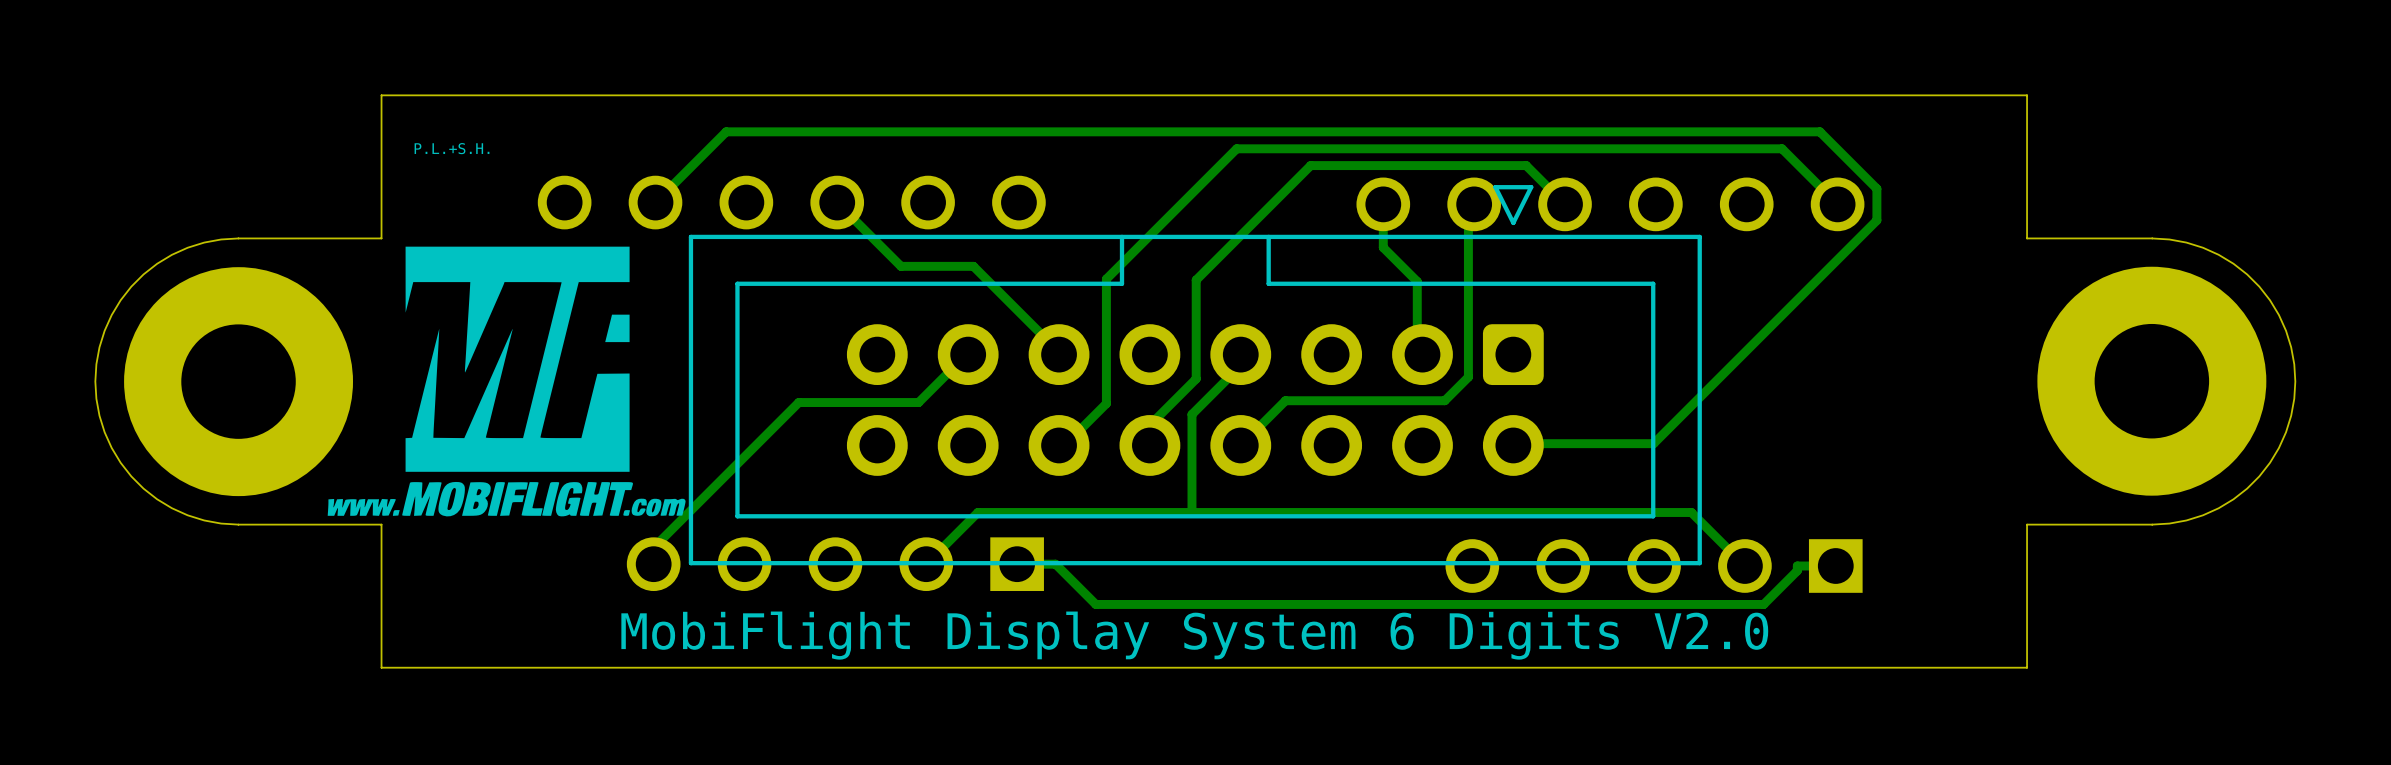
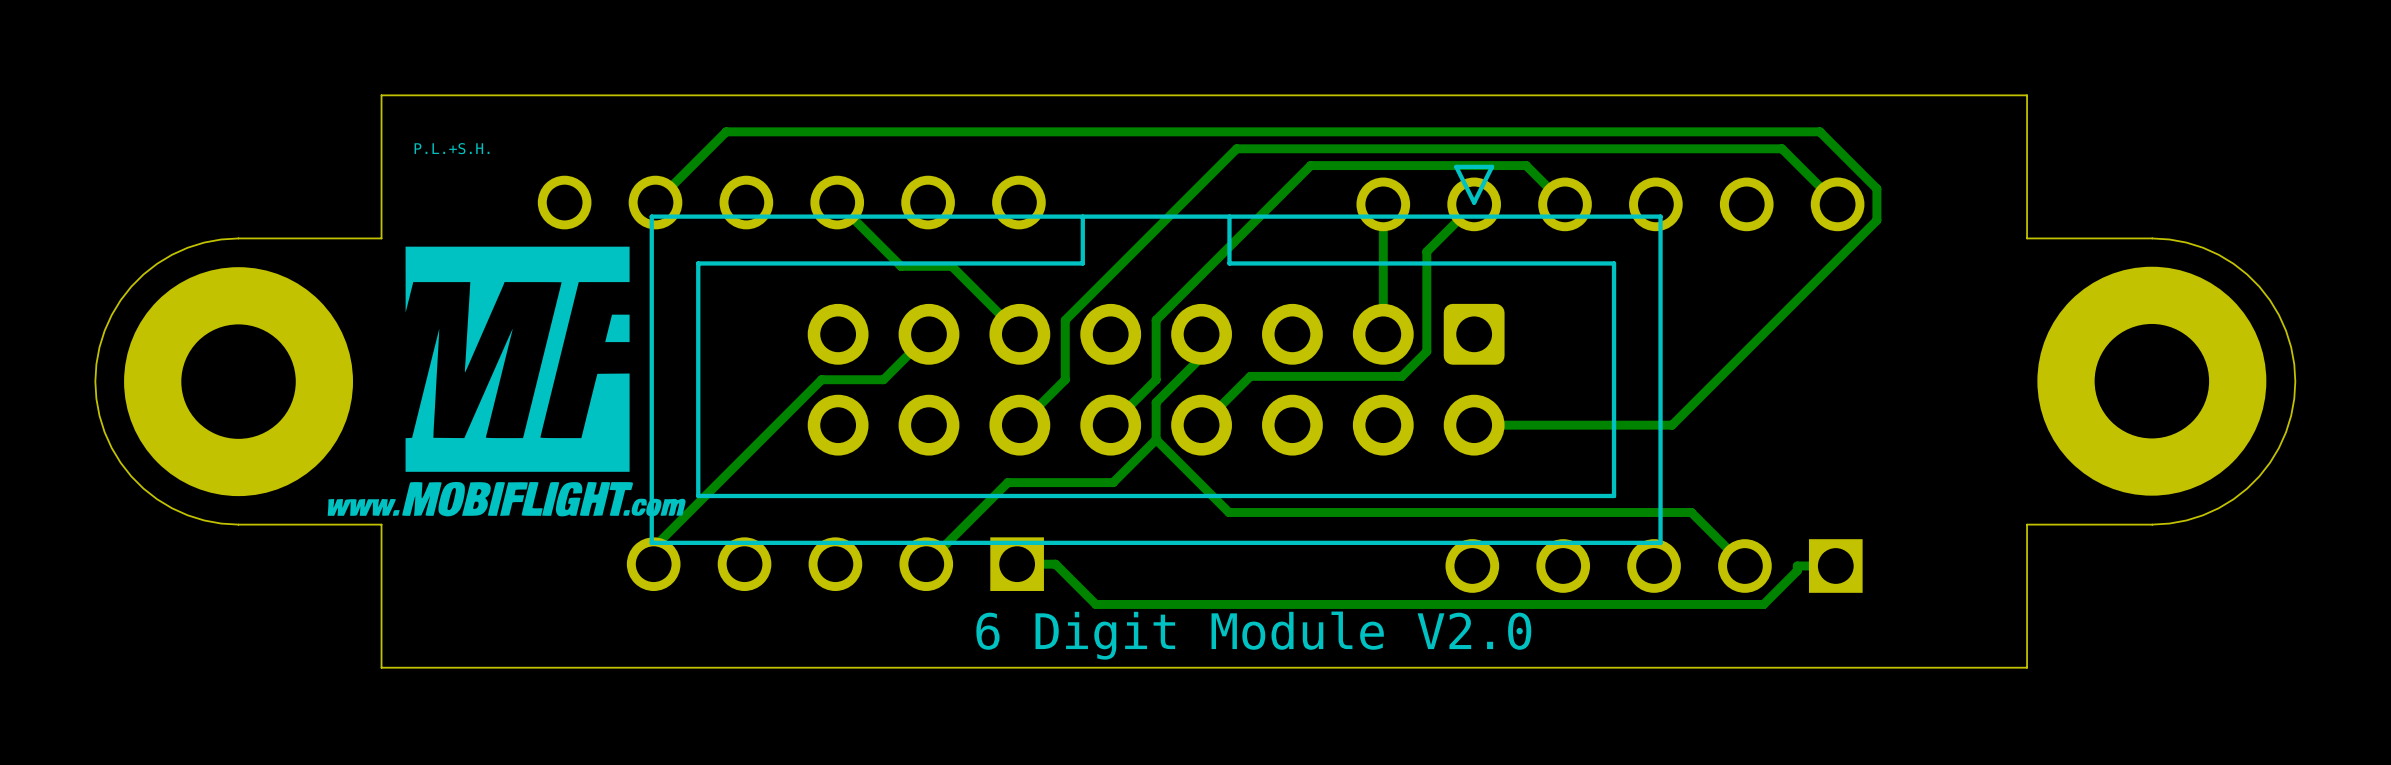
track: (1468, 210) (1468, 377) (1444, 400) (1285, 400) (1240, 445) -> (1468, 210) (1426, 251) (1426, 351) (1401, 376) (1250, 376) (1201, 425)
track: (1383, 247) (1417, 281) (1417, 349) (1422, 354) (1422, 334) -> (1383, 247) (1383, 334)
track: (951, 266) (973, 266) (1059, 351) -> (951, 266) (1019, 334)
track: (1106, 279) (1106, 403) (1064, 445) (1059, 445) (1059, 425) -> (1106, 279) (1065, 320) (1065, 379) (1019, 425)
track: (1196, 280) (1196, 378) (1149, 425) (1149, 445) -> (1196, 280) (1156, 320) (1156, 379) (1110, 425)
track: (968, 334) (968, 354) (918, 402) (798, 402) -> (928, 334) (883, 379) (821, 379) (798, 402)
track: none -> (1201, 334) (1201, 357) (1156, 402) (1156, 439)
part: none -> (1156, 354)
track: (1240, 354) (1240, 365) (1191, 414) (1191, 512) -> none
part: (1195, 375) -> none
track: (1672, 425) (1653, 443) (1531, 443) (1530, 445) (1513, 445) -> (1672, 425) (1474, 425)
track: none -> (1156, 439) (1228, 512)
track: (1228, 512) (977, 512) -> (1156, 439) (1113, 482) (1007, 482) (977, 512)
text: MobiFlight Display System 6 Digits V2.0 (1194, 635) -> none
text: none -> 6 Digit Module V2.0 (1253, 635)

